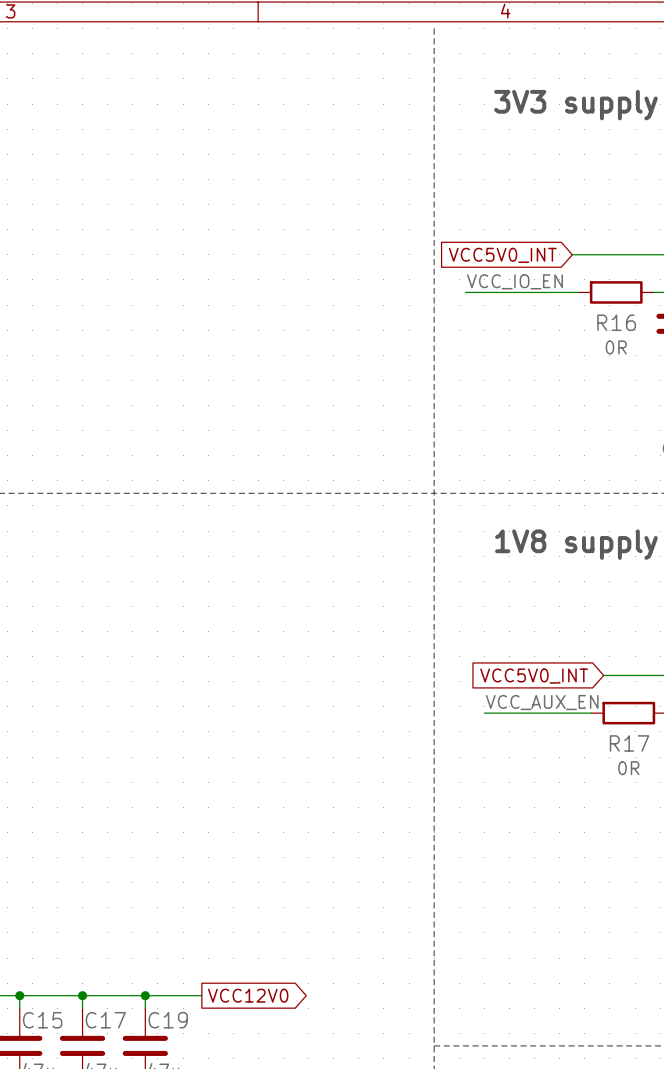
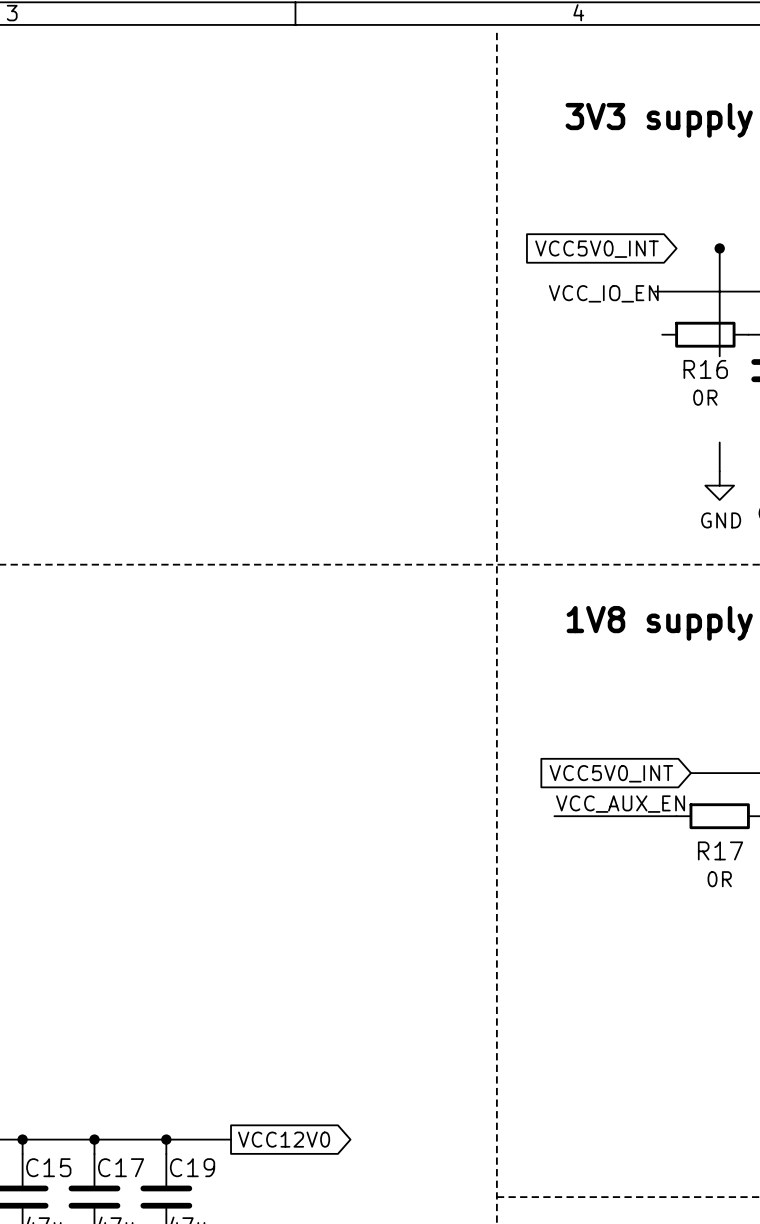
wire: none -> (719, 248) (719, 356)
junction: none -> (719, 248)
global label position: VCC5V0_INT (502, 255) -> VCC5V0_INT (597, 249)
label position: VCC_IO_EN (514, 281) -> VCC_IO_EN (603, 293)
wire: (465, 292) (578, 292) -> none
wire: none -> (719, 442) (719, 471)
power symbol: none -> GND (719, 485)

